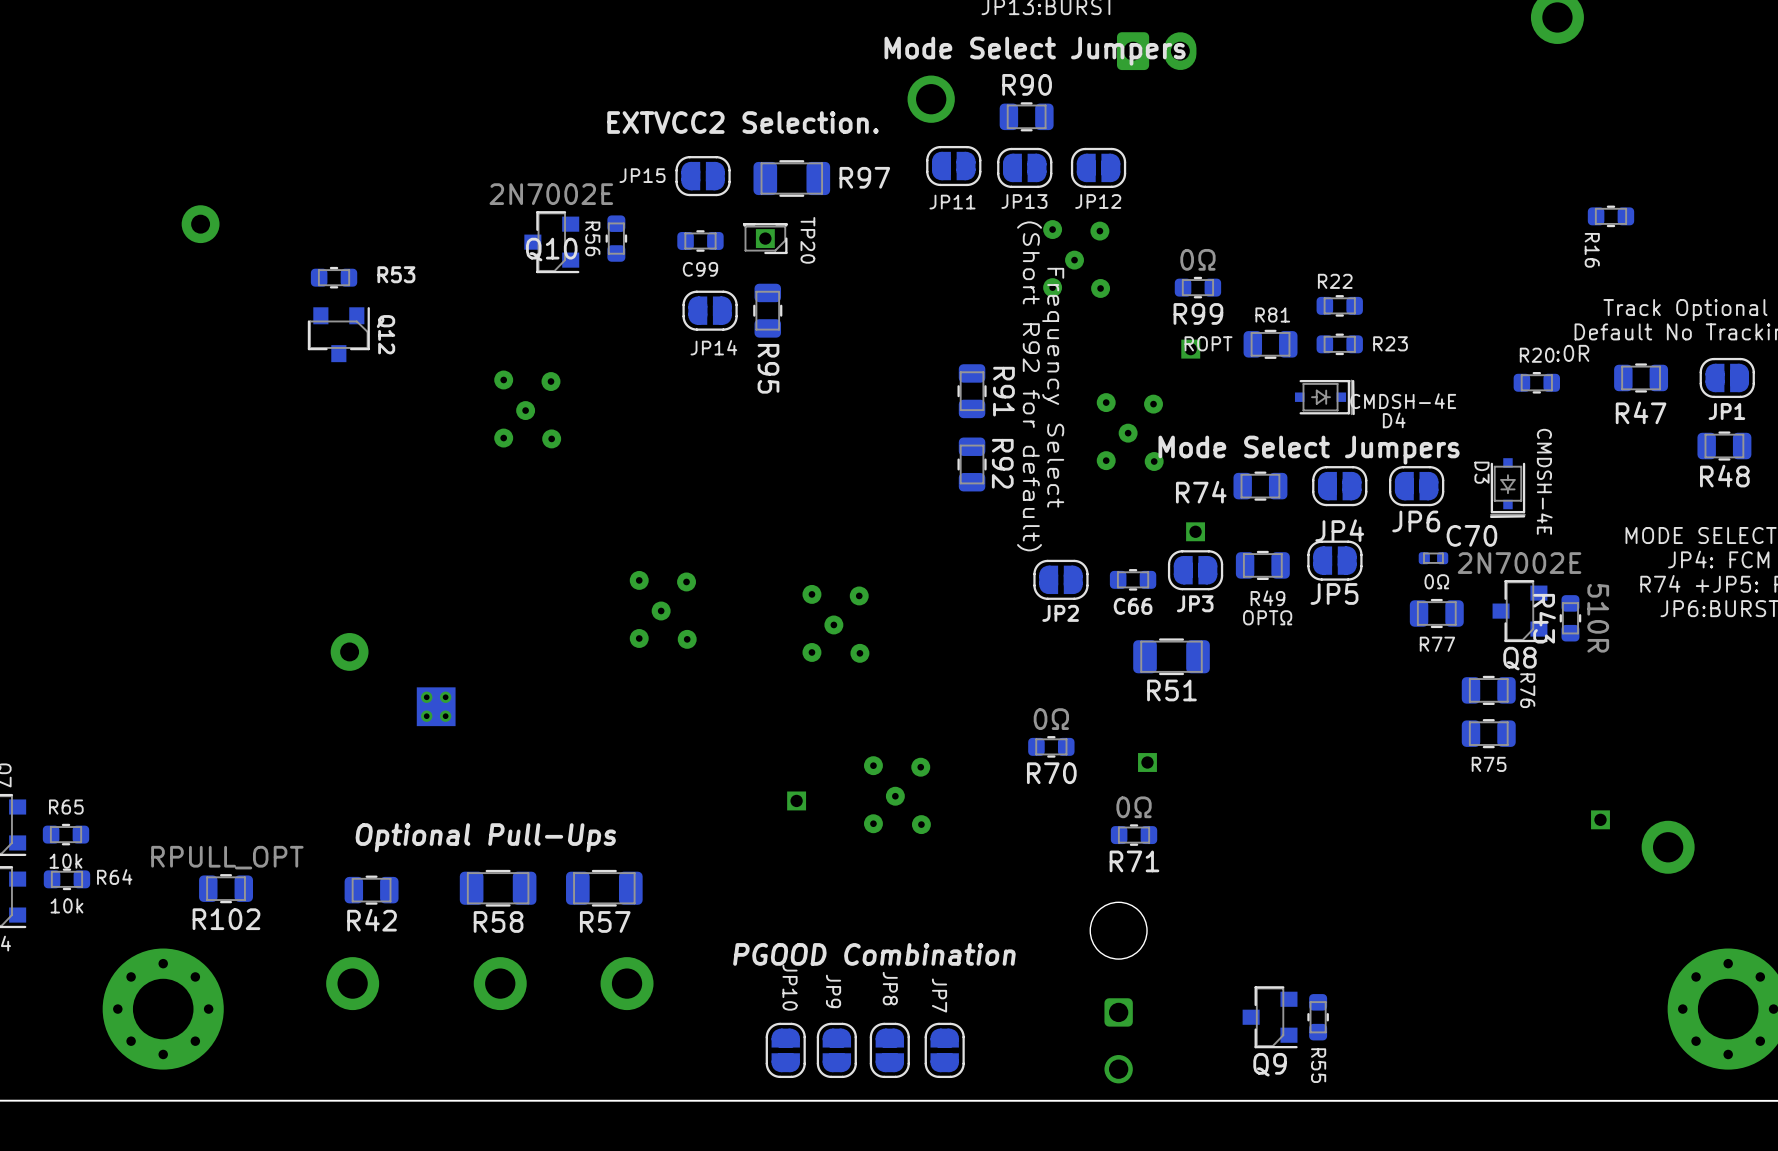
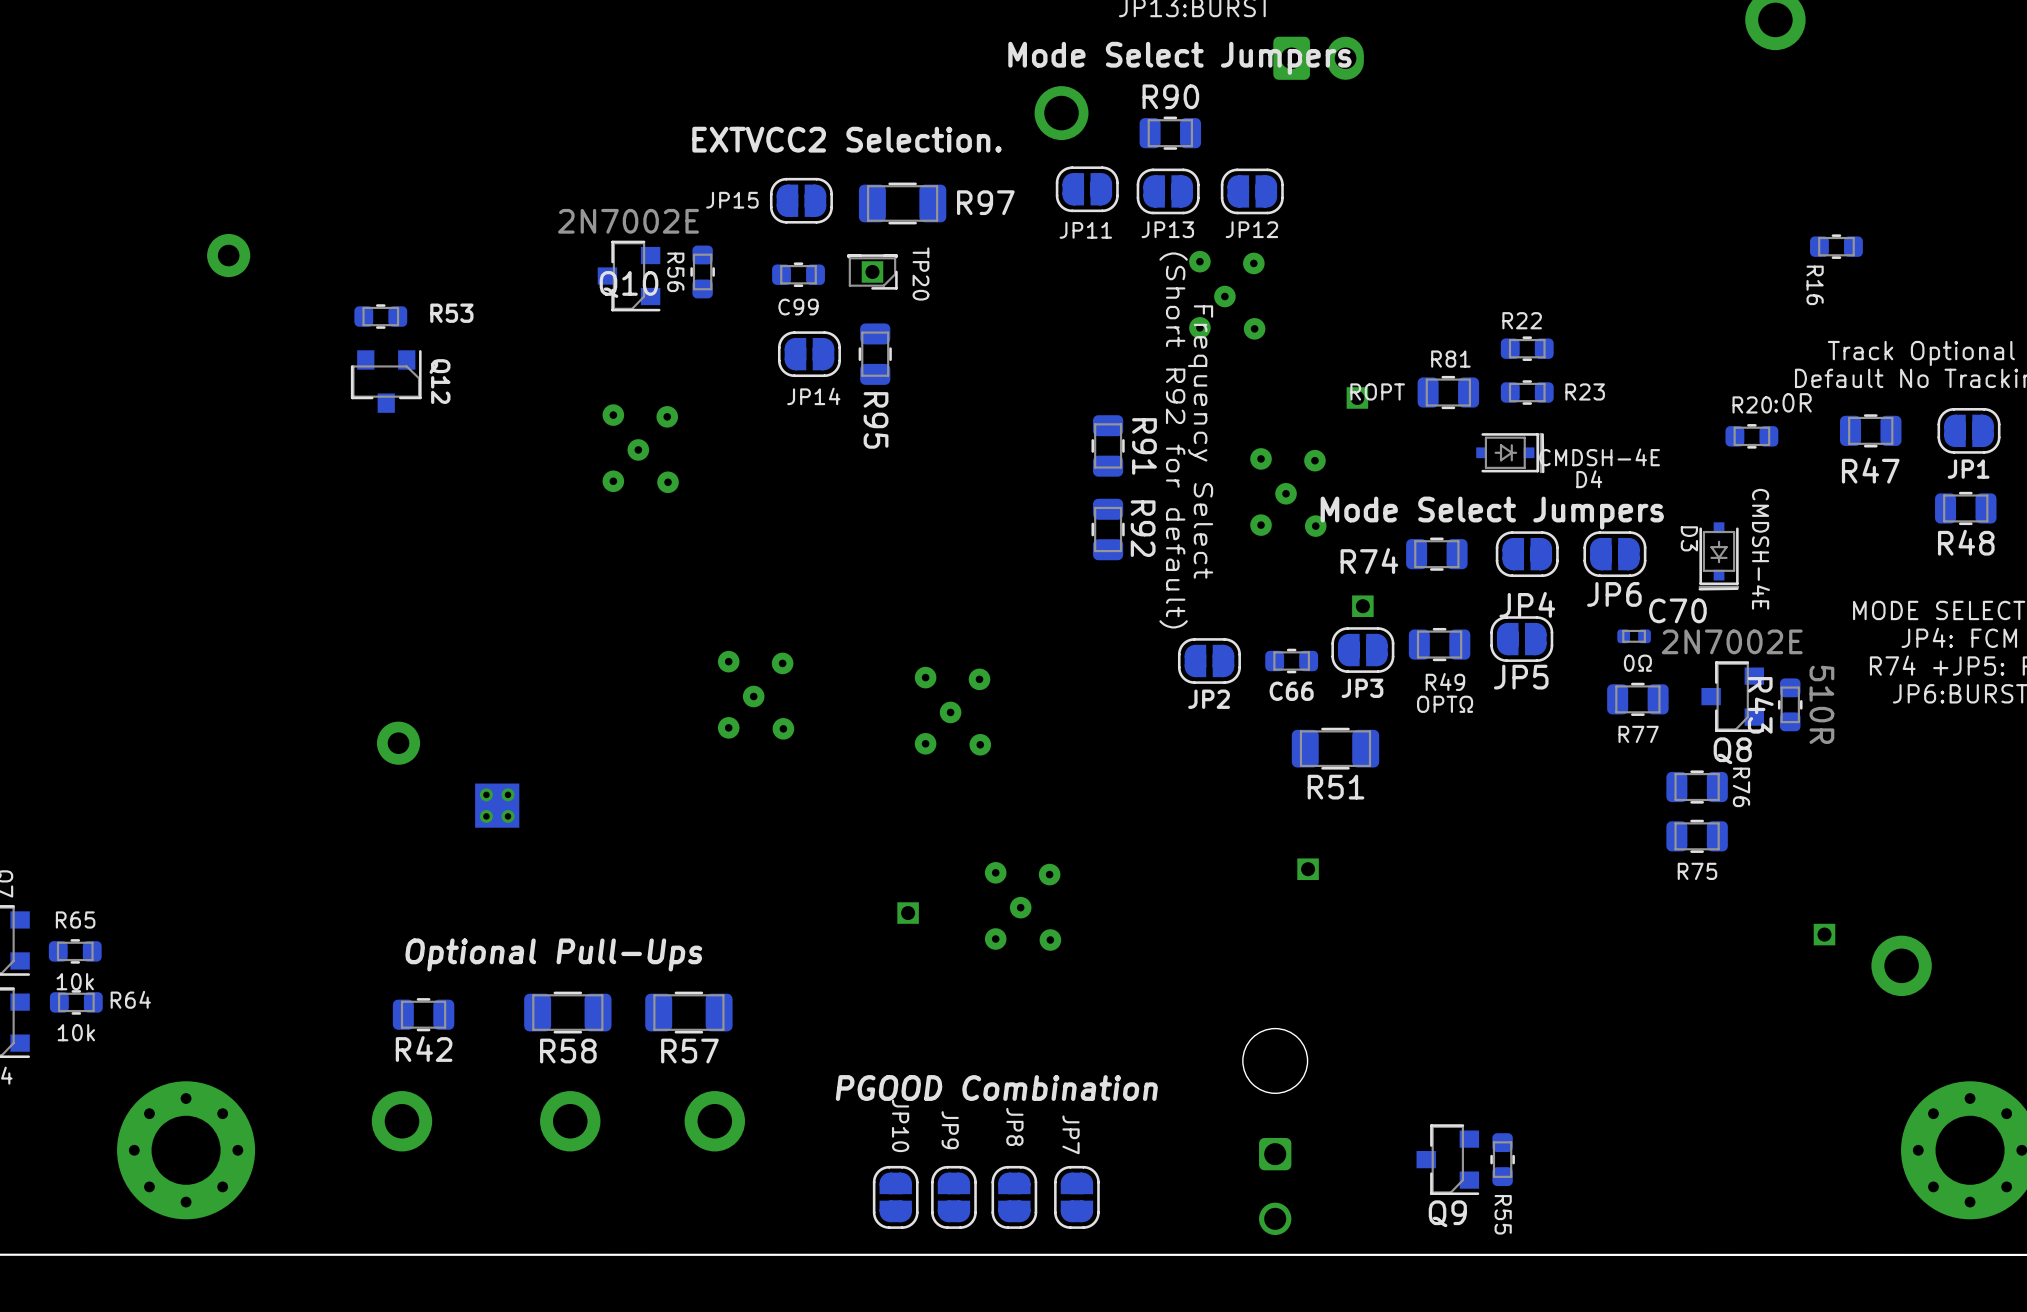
R99: 0Ω (1197, 287) -> none
part position: (527, 409) -> (640, 448)
R70: 0Ω (1051, 746) -> none
R71: 0Ω (1134, 835) -> none
R102: RPULL_OPT (226, 888) -> none

